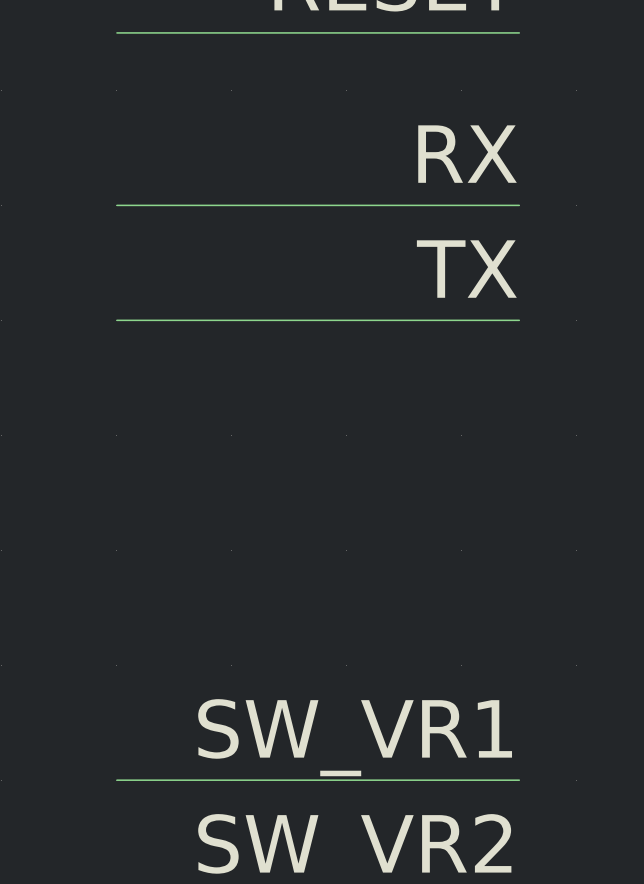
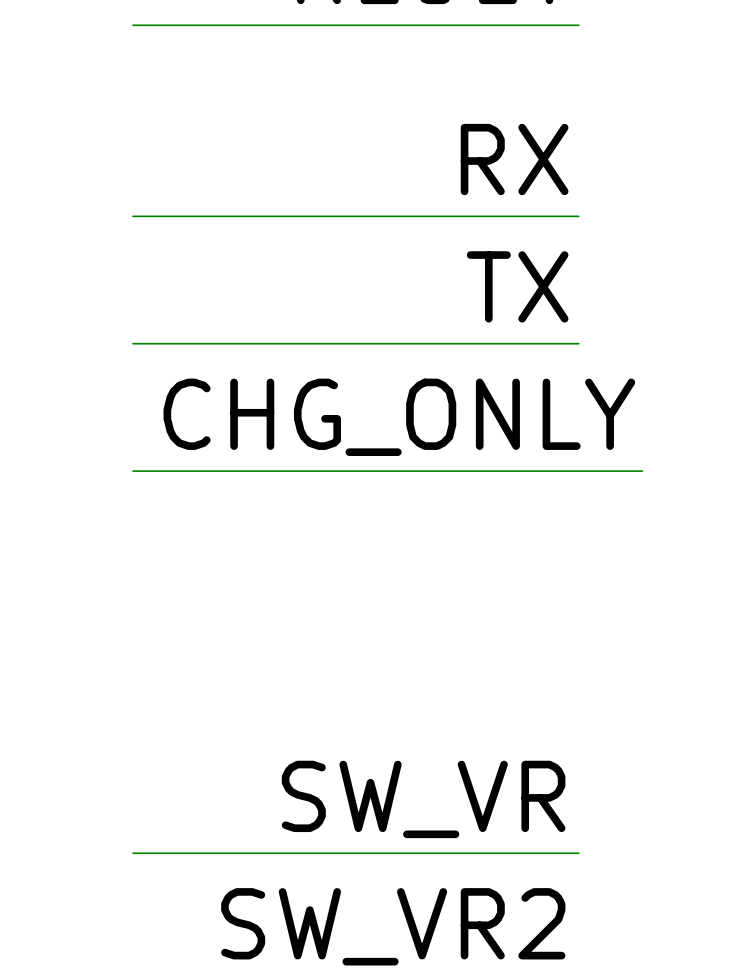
label: none -> CHG_ONLY (399, 417)
wire: none -> (132, 471) (642, 471)
label: SW_VR1 (355, 737) -> SW_VR (423, 799)

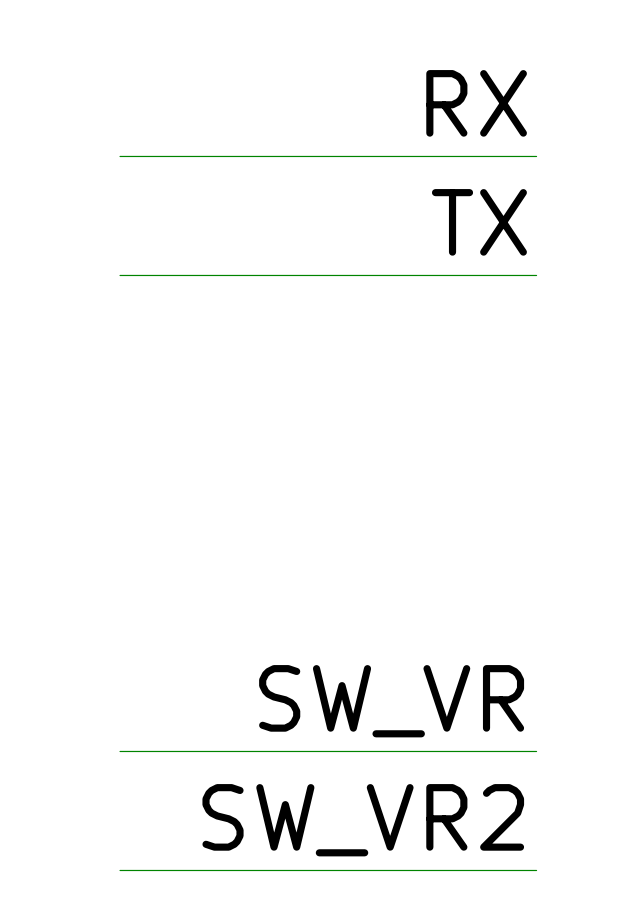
label: CHG_ONLY (399, 417) -> none
wire: (132, 471) (642, 471) -> none

